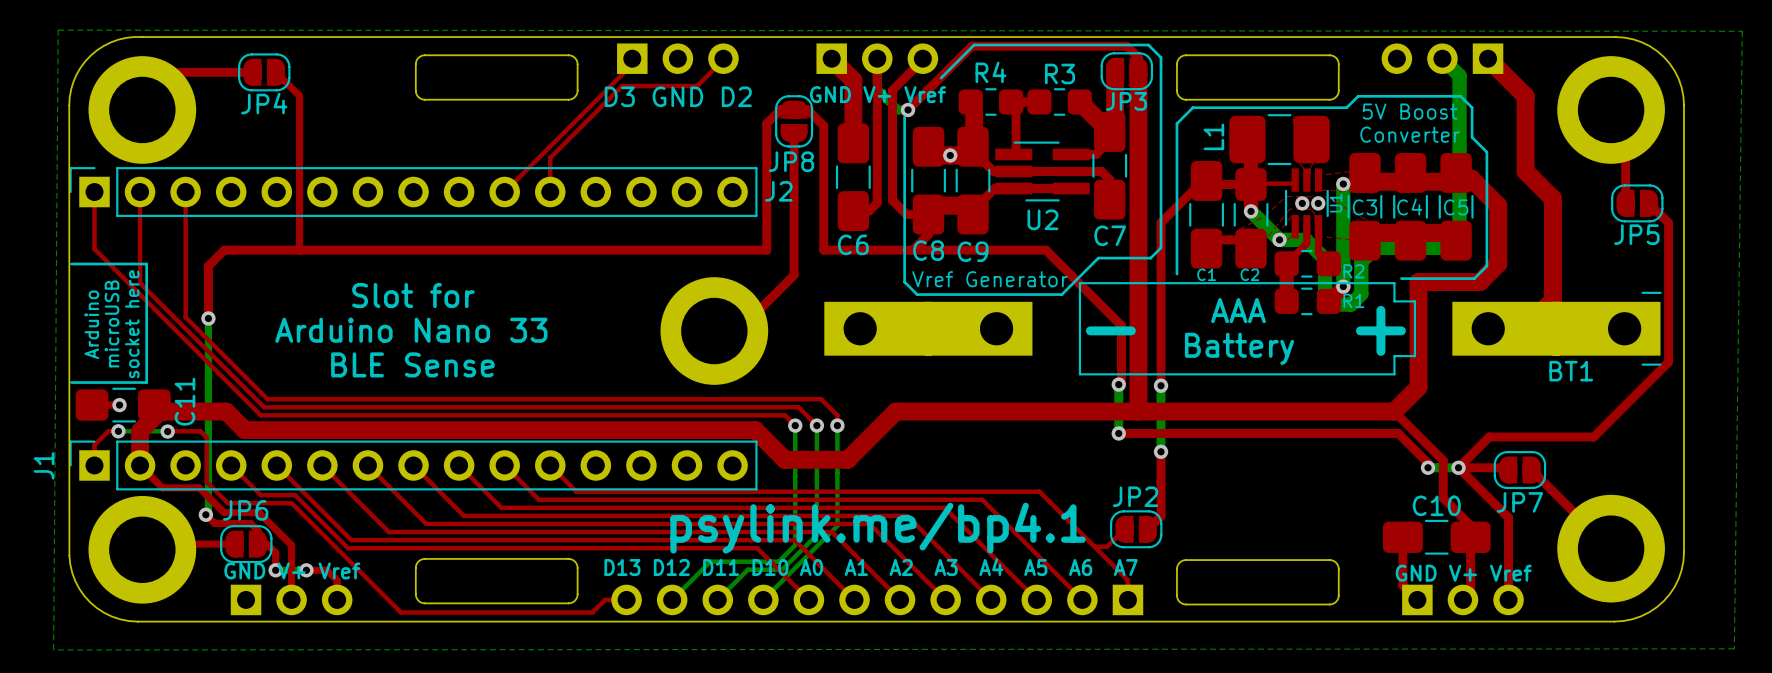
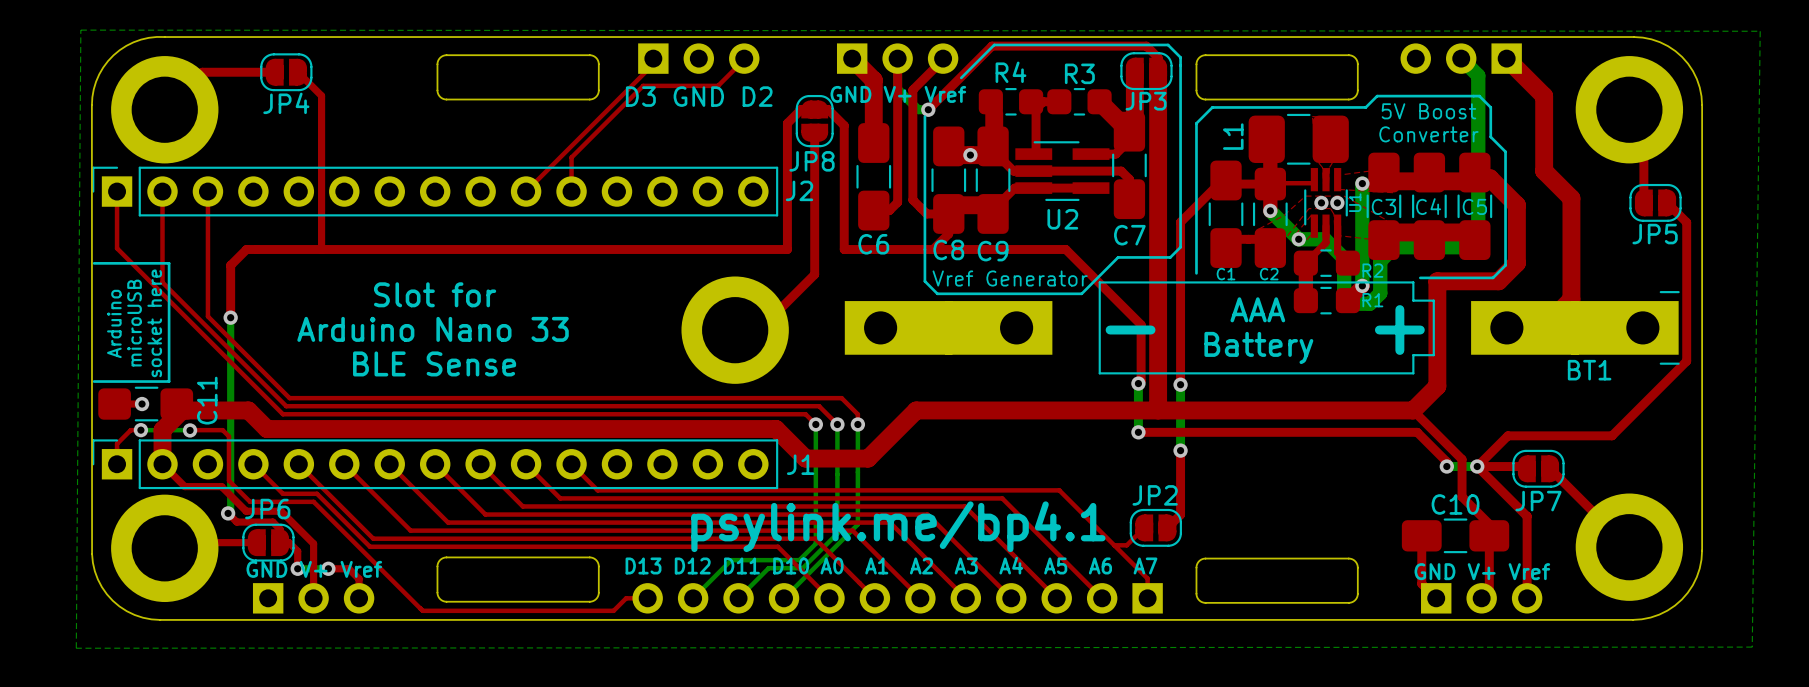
J1 name rotation: 0° (44, 465) -> 90° clockwise (800, 464)
J1 name position: J1 (44, 465) -> J1 (800, 464)

